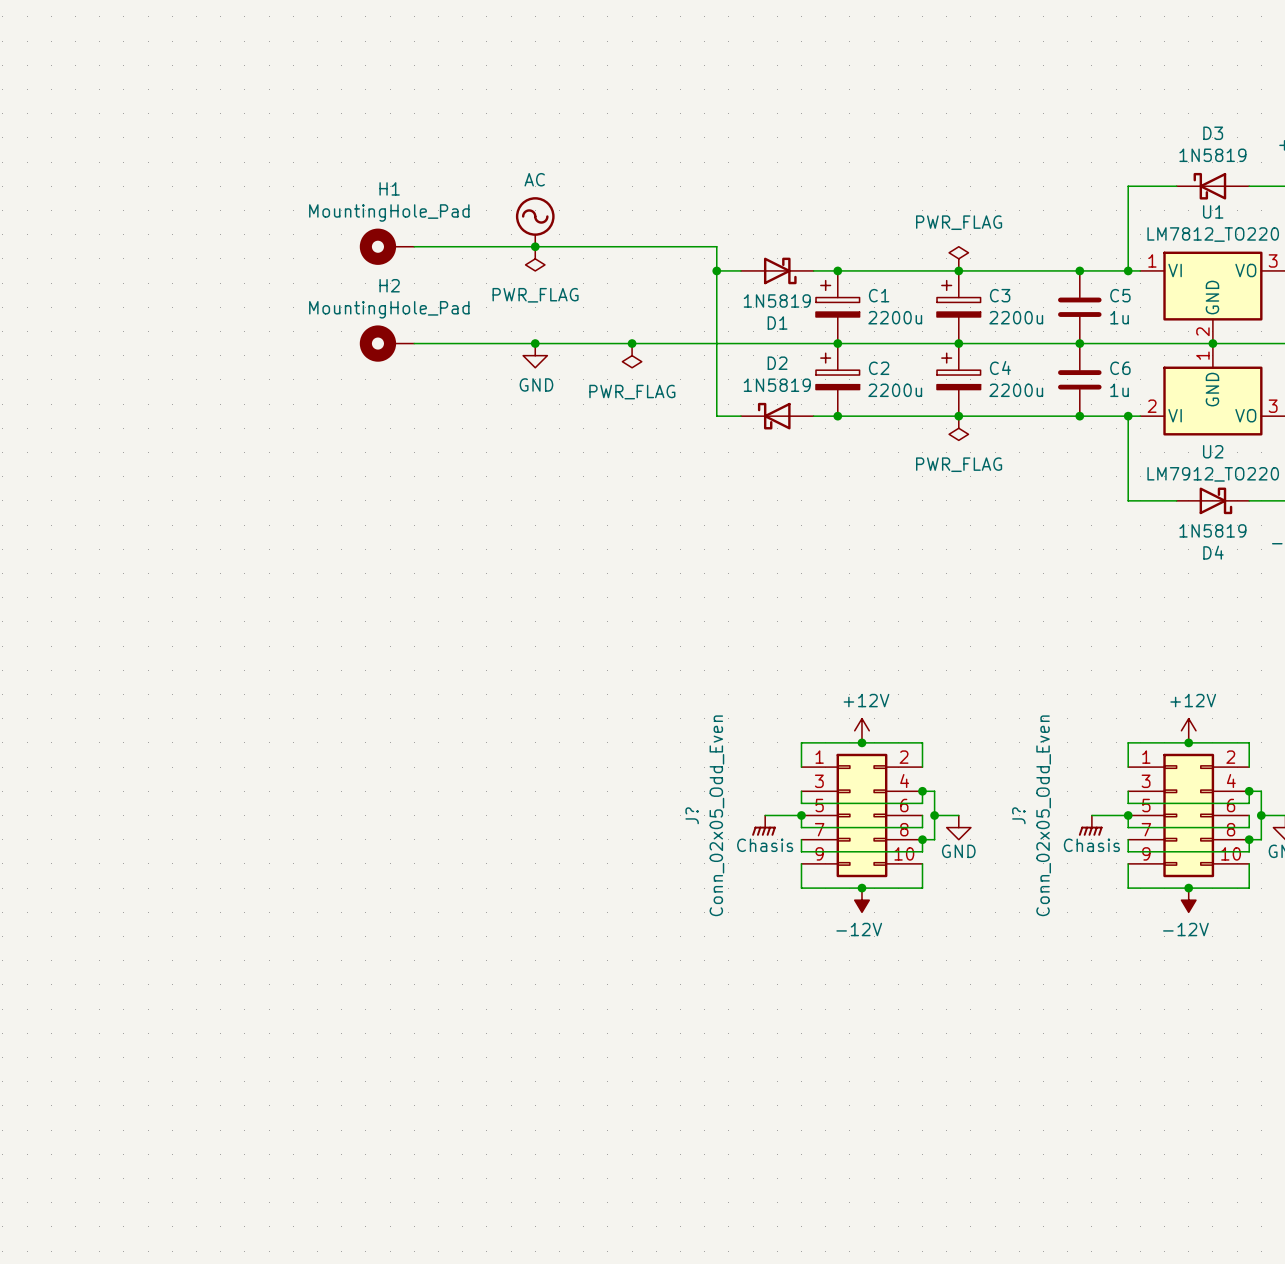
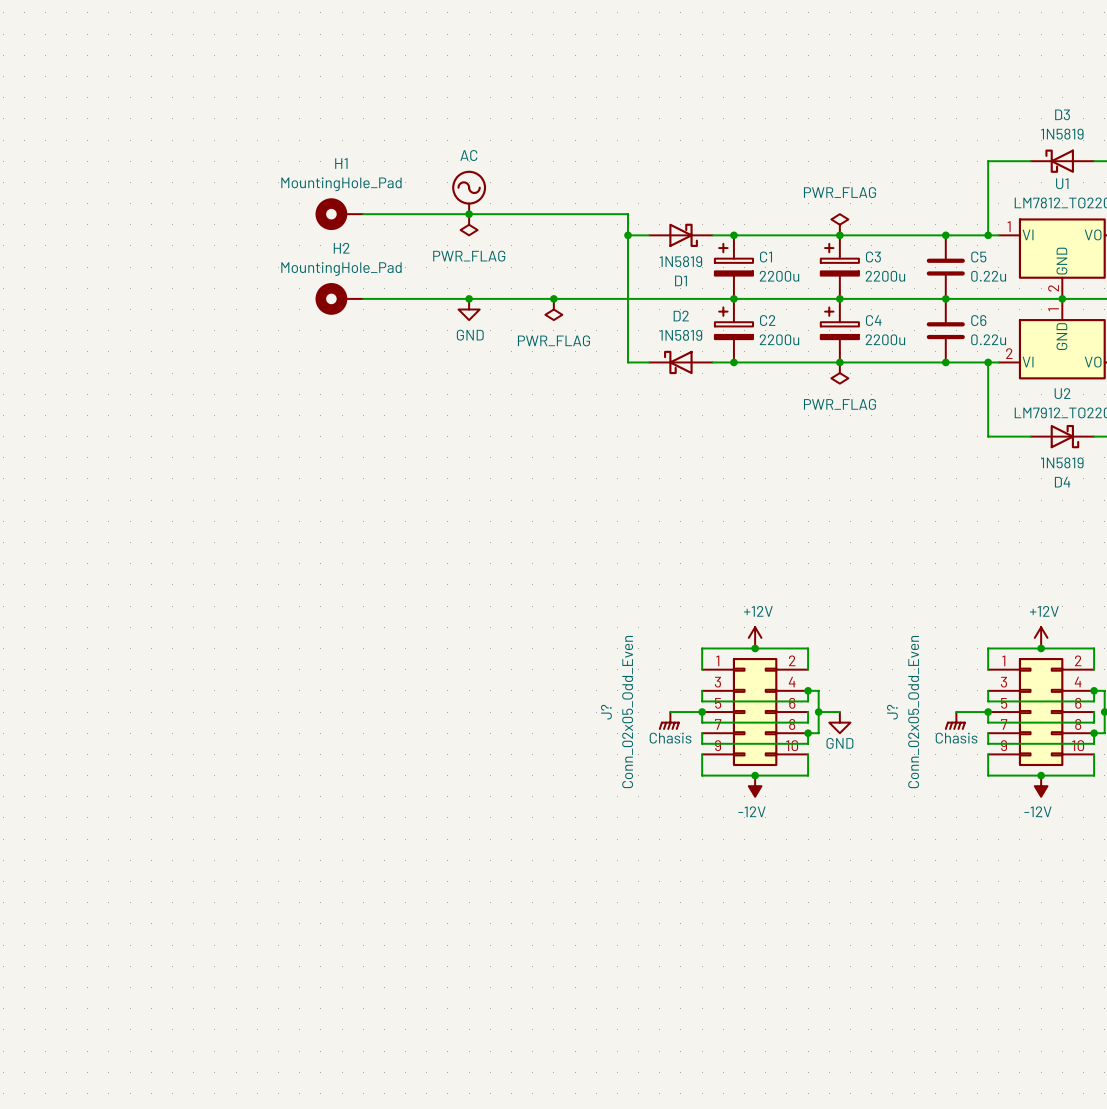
C5 value: 1u (1119, 317) -> 0.22u (988, 276)
C6 value: 1u (1119, 390) -> 0.22u (988, 339)

